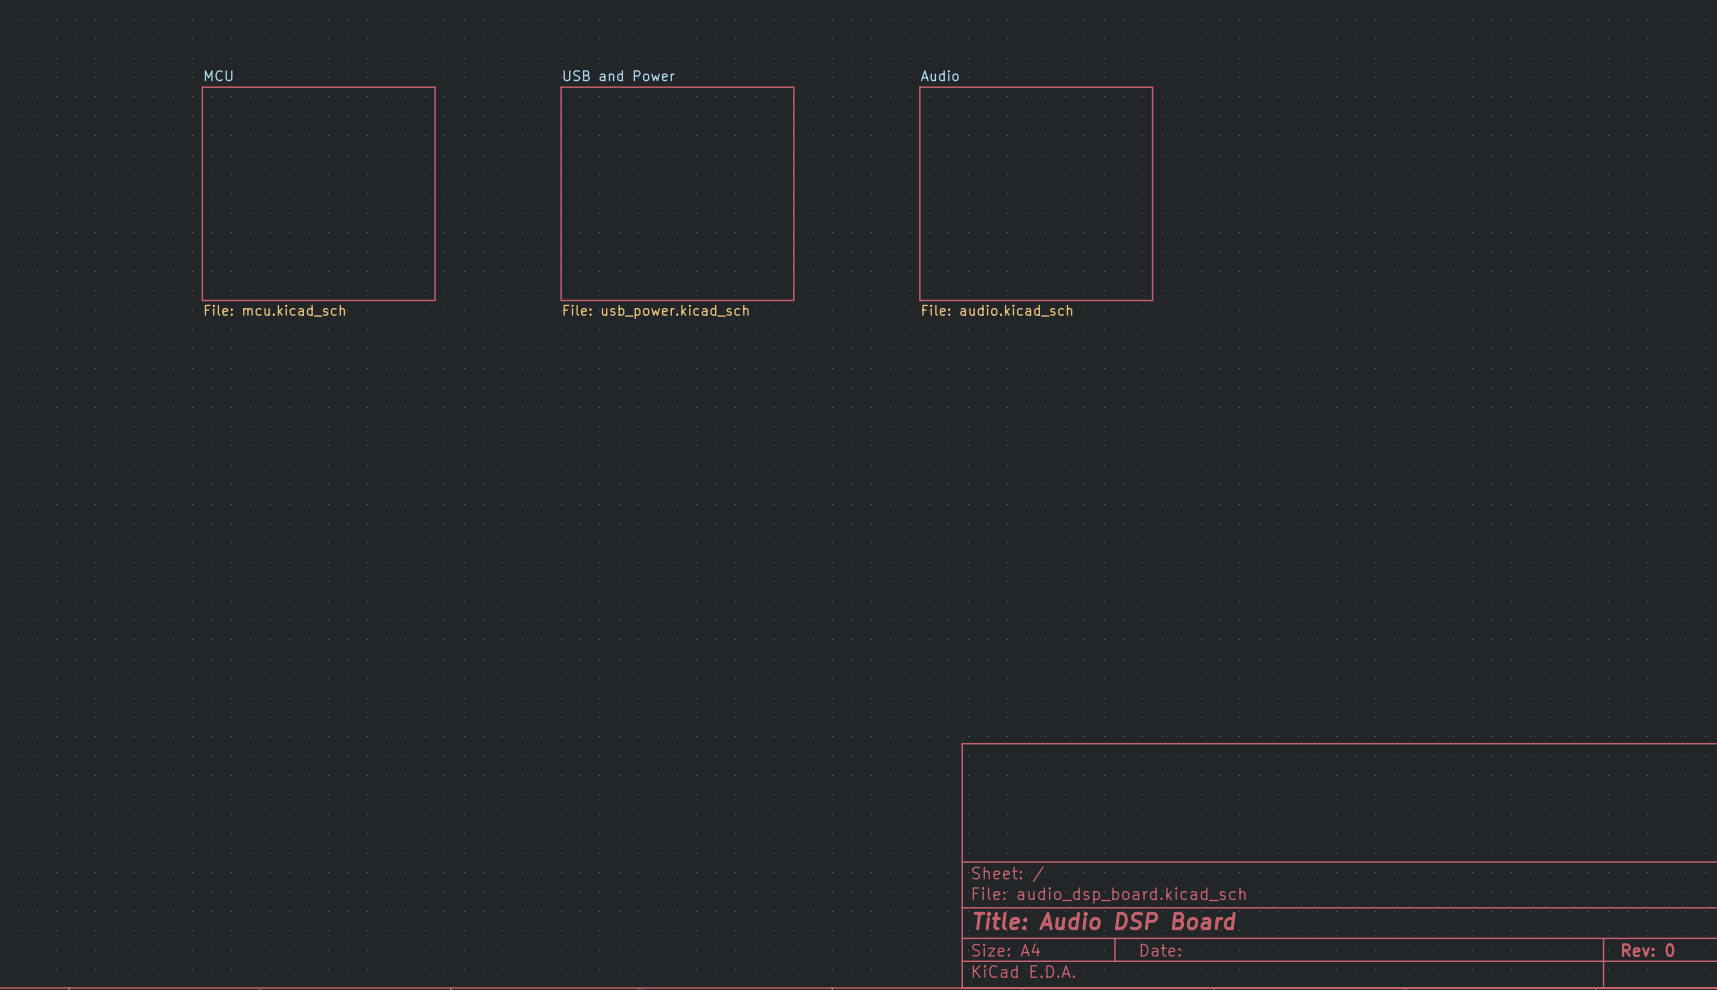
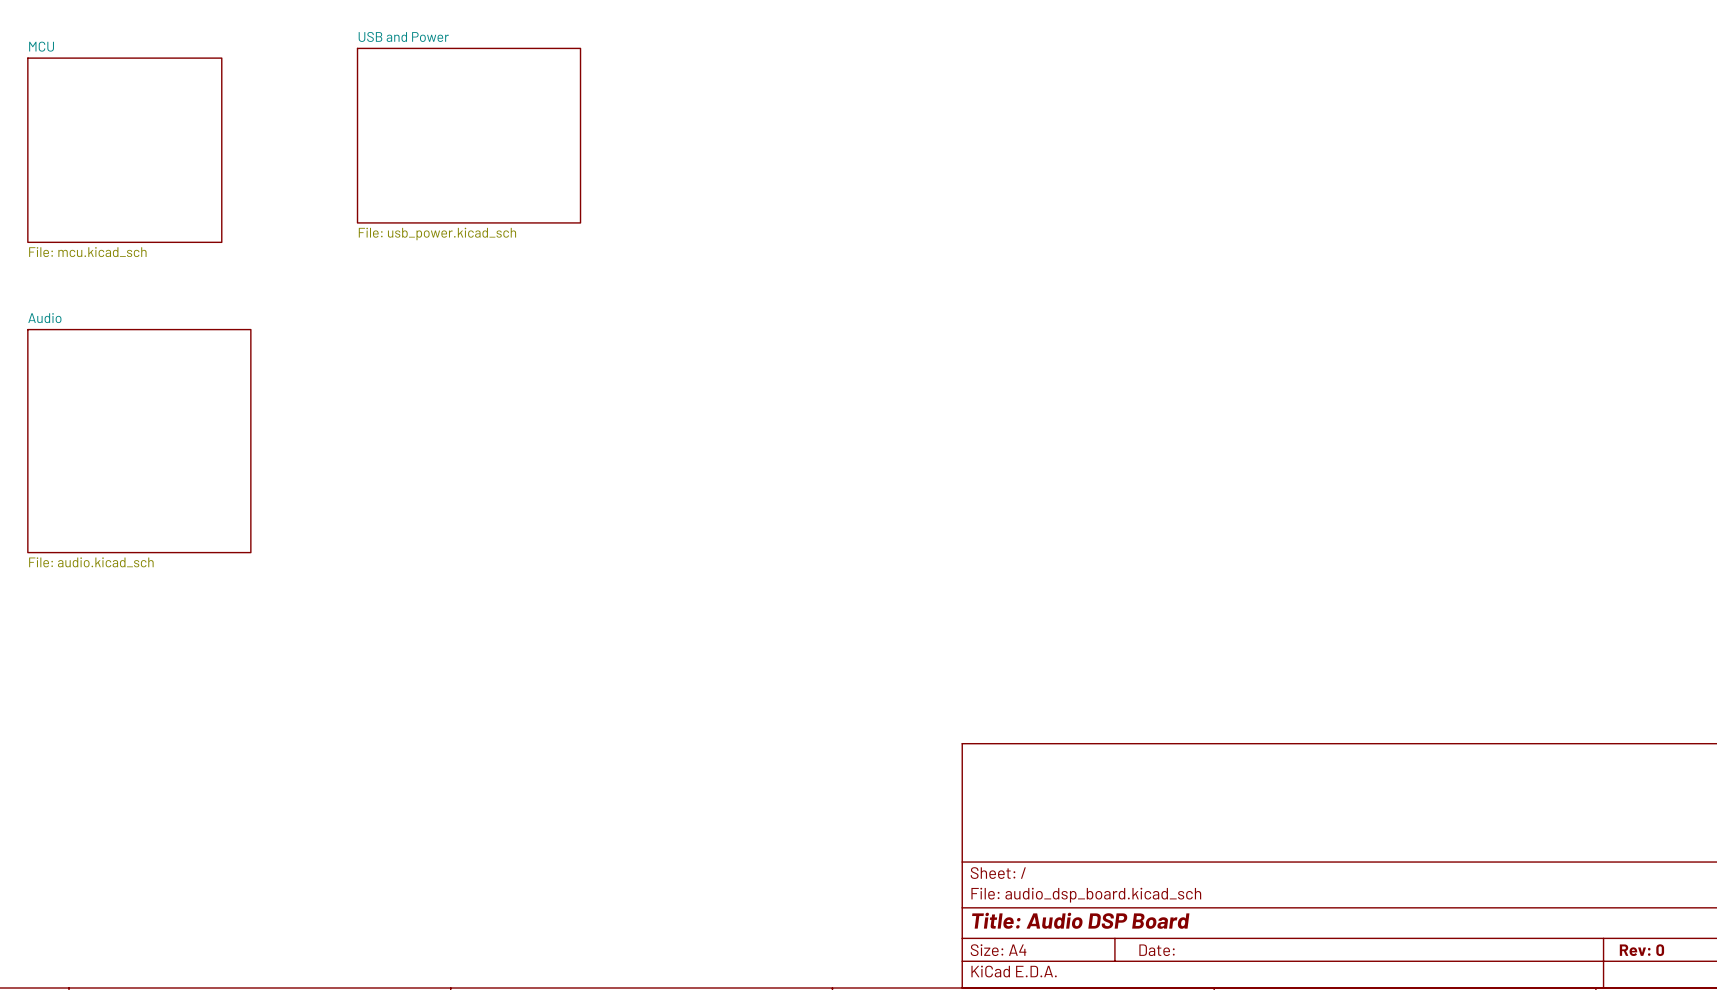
sheet USB and Power: none -> File: usb_power.kicad_sch (469, 135)
sheet MCU: none -> File: mcu.kicad_sch (124, 150)
sheet MCU: File: mcu.kicad_sch (318, 193) -> none
sheet USB and Power: File: usb_power.kicad_sch (677, 193) -> none
sheet Audio: File: audio.kicad_sch (1036, 193) -> none
sheet Audio: none -> File: audio.kicad_sch (139, 441)

